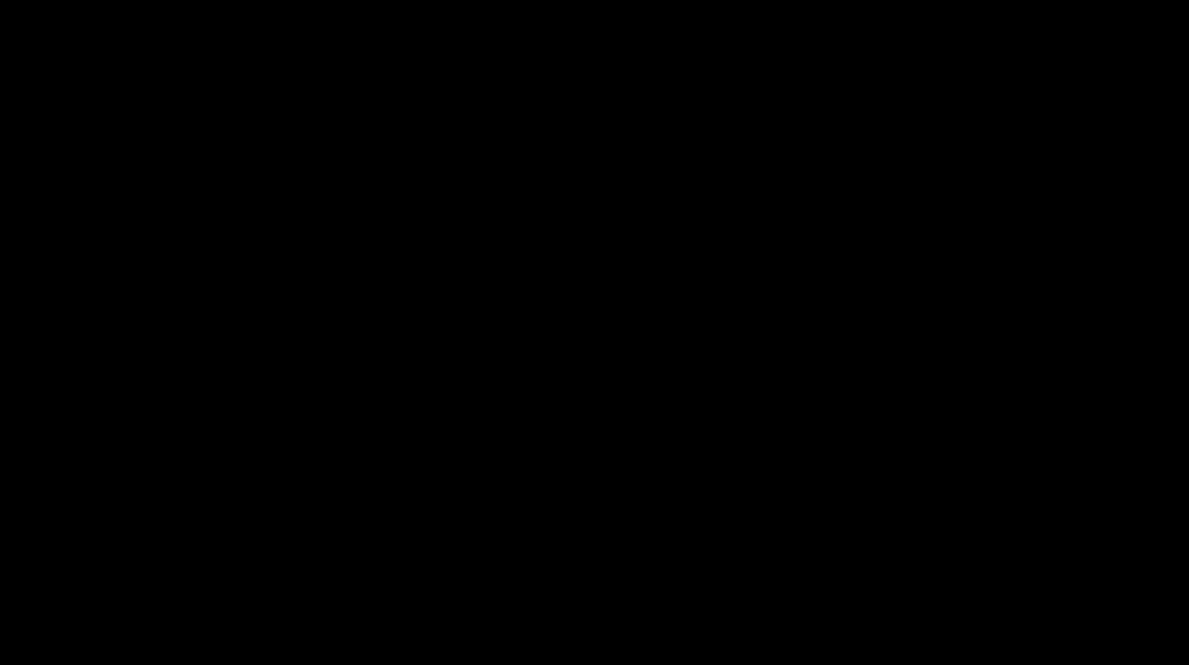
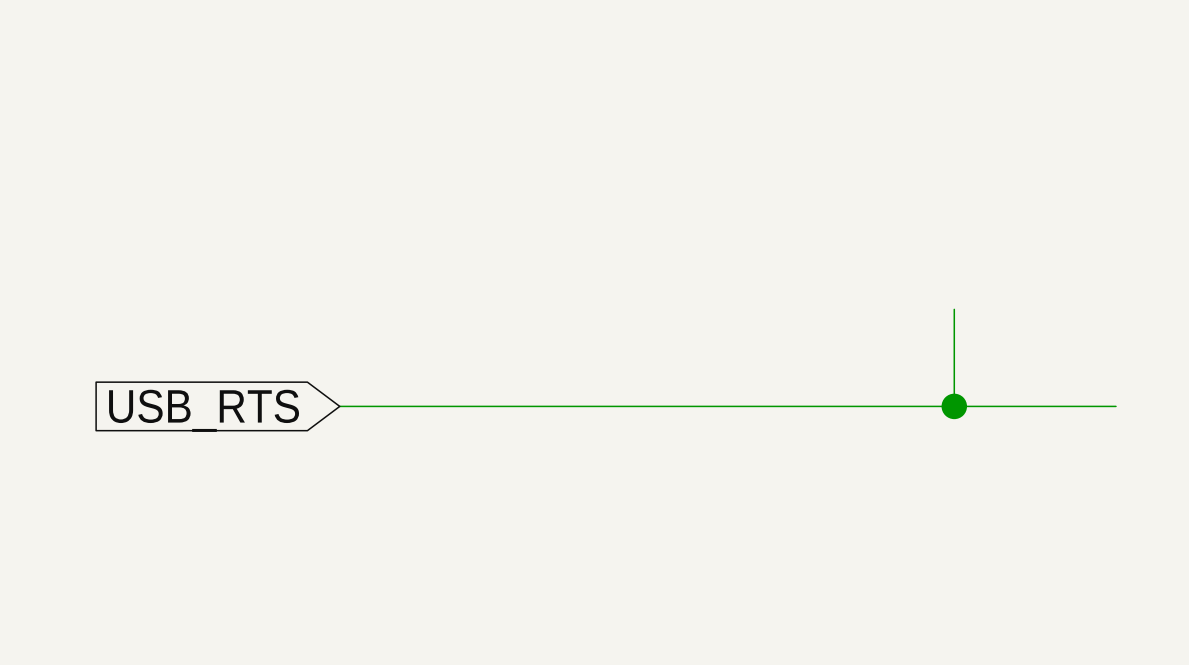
wire: none -> (954, 309) (954, 406)
wire: none -> (339, 406) (1116, 406)
junction: none -> (954, 406)
global label: none -> USB_RTS (204, 410)

